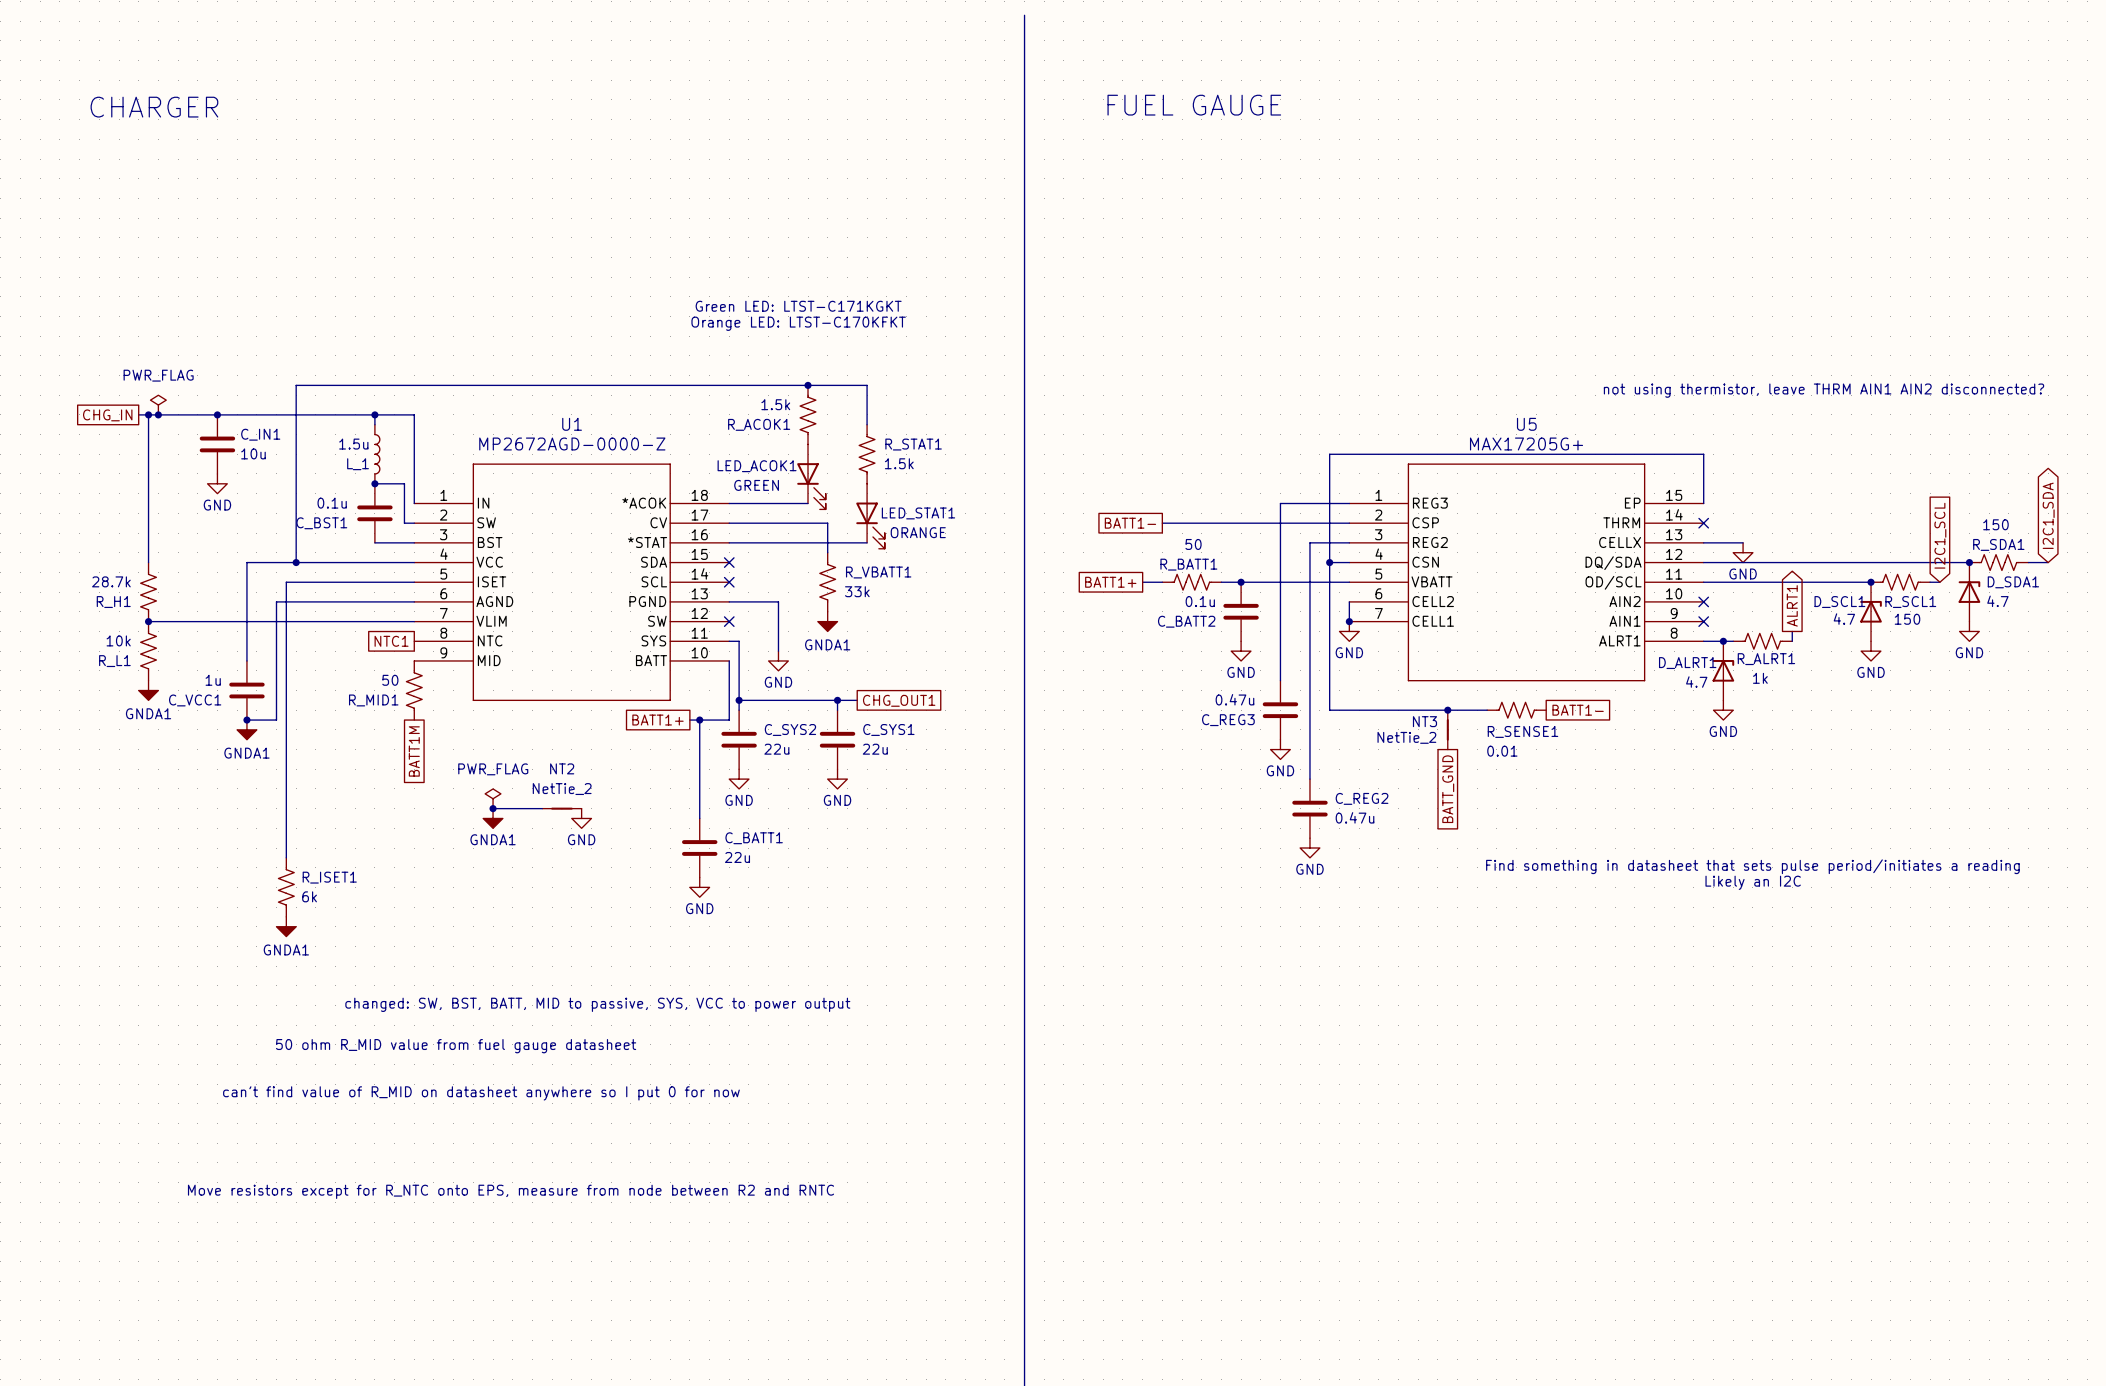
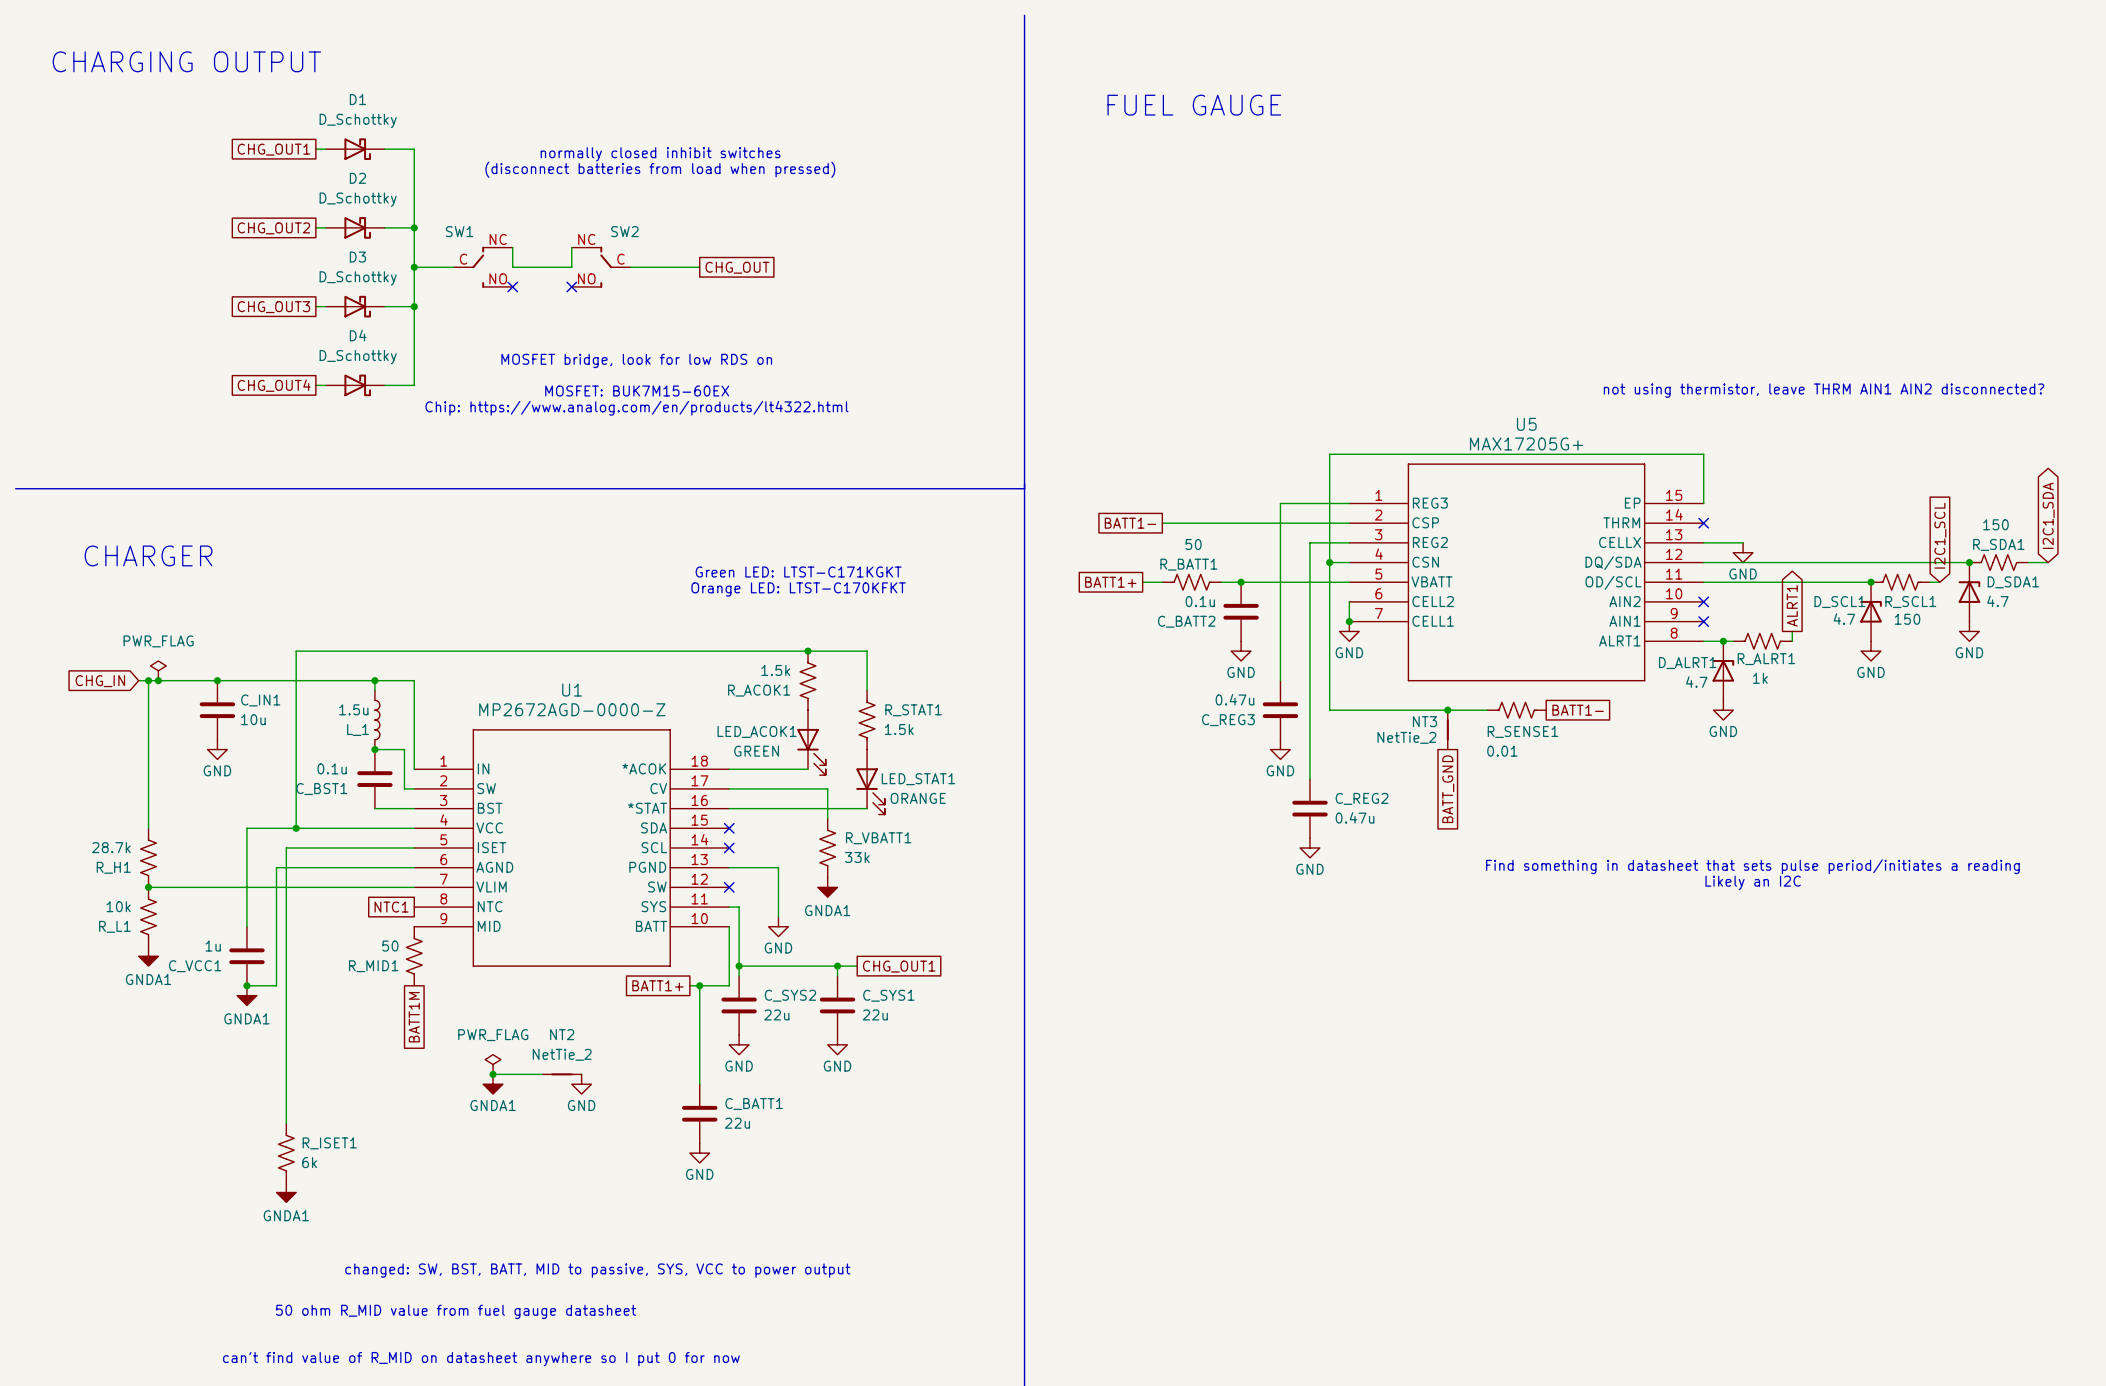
text: none -> CHARGING OUTPUT (186, 61)
text: CHARGER (154, 107) -> none
global label: none -> CHG_OUT1 (273, 149)
wire: none -> (315, 149) (325, 149)
D1: none -> D_Schottky (355, 149)
text: none -> normally closed inhibit switches (660, 154)
text: none -> (disconnect batteries from load when pressed) (660, 169)
wire: none -> (315, 227) (325, 227)
D2: none -> D_Schottky (355, 227)
wire: none -> (384, 227) (414, 227)
junction: none -> (414, 227)
global label: none -> CHG_OUT2 (273, 228)
wire: none -> (512, 247) (512, 267) (571, 267) (571, 247)
wire: none -> (414, 267) (453, 267)
junction: none -> (414, 267)
SW1: none -> (483, 267)
SW2: none -> (601, 267)
wire: none -> (630, 267) (699, 267)
global label: none -> CHG_OUT (737, 267)
no-connect mark: none -> (512, 286)
no-connect mark: none -> (571, 286)
wire: none -> (315, 306) (325, 306)
D3: none -> D_Schottky (355, 306)
wire: none -> (384, 306) (414, 306)
junction: none -> (414, 306)
text: Green LED: LTST-C171KGKT (798, 306) -> none
global label: none -> CHG_OUT3 (273, 307)
text: Orange LED: LTST-C170KFKT (798, 323) -> none
text: none -> MOSFET bridge, look for low RDS on (636, 360)
global label: none -> CHG_OUT4 (274, 385)
wire: (315, 385) (296, 385) (296, 562) -> none
D4: none -> D_Schottky (355, 385)
wire: (414, 385) (867, 385) (867, 424) -> (414, 385) (414, 149) (384, 149)
junction: (808, 385) -> none
text: none -> MOSFET: BUK7M15-60EX (637, 391)
power symbol: PWR_FLAG (158, 405) -> none
text: none -> Chip: https://www.analog.com/en/products/lt4322.html (636, 408)
wire: (138, 414) (414, 414) (414, 503) -> none
wire: (148, 414) (148, 562) -> none
junction: (148, 414) -> none
junction: (158, 414) -> none
junction: (217, 414) -> none
wire: (374, 414) (374, 424) -> none
junction: (374, 414) -> none
R_ACOK1 position: (808, 414) -> (808, 680)
global label: CHG_IN (107, 415) -> none
C_IN1 position: (217, 444) -> (217, 710)
L_1 position: (377, 454) -> (377, 720)
R_STAT1 position: (867, 454) -> (867, 720)
LED_ACOK1 position: (811, 476) -> (811, 742)
power symbol: GND (217, 483) -> none
wire: (374, 483) (404, 483) (404, 523) (414, 523) -> none
junction: (374, 483) -> none
line: none -> (15, 488) (1024, 488)
wire: (729, 503) (808, 503) -> none
C_BST1 position: (374, 513) -> (374, 779)
LED_STAT1 position: (870, 516) -> (870, 782)
wire: (729, 523) (827, 523) (827, 552) -> none
wire: (374, 542) (414, 542) -> none
wire: (729, 542) (867, 542) -> none
text: none -> CHARGER (148, 555)
junction: (296, 562) -> none
wire: (414, 562) (246, 562) (246, 660) -> none
no-connect mark: (729, 562) -> none
text: none -> Green LED: LTST-C171KGKT (798, 572)
wire: (414, 582) (286, 582) (286, 848) -> (414, 848) (286, 848)
U1 position: (571, 582) -> (571, 848)
no-connect mark: (729, 582) -> none
R_VBATT1 position: (827, 582) -> (827, 848)
text: none -> Orange LED: LTST-C170KFKT (798, 589)
R_H1 position: (148, 592) -> (148, 857)
wire: (414, 601) (276, 601) (276, 720) (246, 720) -> none
wire: (729, 601) (778, 601) (778, 651) -> none
wire: (148, 621) (414, 621) -> none
junction: (148, 621) -> none
no-connect mark: (729, 621) -> none
power symbol: GNDA1 (827, 621) -> none
global label: NTC1 (391, 641) -> none
wire: (729, 641) (739, 641) (739, 710) -> none
R_L1 position: (148, 651) -> (148, 916)
junction: none -> (808, 651)
wire: (729, 660) (729, 720) (689, 720) -> none
power symbol: GND (778, 660) -> none
power symbol: none -> PWR_FLAG (158, 670)
wire: none -> (138, 680) (414, 680) (414, 769)
wire: none -> (148, 680) (148, 828)
junction: none -> (148, 680)
junction: none -> (158, 680)
junction: none -> (217, 680)
wire: none -> (374, 680) (374, 690)
junction: none -> (374, 680)
global label: none -> CHG_IN (100, 681)
power symbol: GNDA1 (148, 690) -> none
C_VCC1 position: (246, 690) -> (246, 956)
R_MID1 position: (414, 690) -> (414, 956)
wire: none -> (867, 690) (867, 651) (296, 651) (296, 828)
wire: (739, 700) (857, 700) -> none
junction: (739, 700) -> none
wire: (837, 700) (837, 710) -> none
junction: (837, 700) -> none
global label: CHG_OUT1 (899, 700) -> none
junction: (246, 720) -> none
global label: BATT1+ (658, 720) -> none
wire: (699, 720) (699, 818) -> none
junction: (699, 720) -> none
power symbol: GNDA1 (246, 729) -> none
C_SYS2 position: (739, 739) -> (739, 1005)
C_SYS1 position: (837, 739) -> (837, 1005)
power symbol: none -> GND (217, 749)
wire: none -> (374, 749) (404, 749) (404, 788) (414, 788)
junction: none -> (374, 749)
global label: BATT1M (414, 751) -> none
wire: none -> (729, 769) (808, 769)
power symbol: GND (739, 779) -> none
power symbol: GND (837, 779) -> none
wire: none -> (729, 788) (827, 788) (827, 818)
power symbol: PWR_FLAG (493, 798) -> none
wire: none -> (374, 808) (414, 808)
wire: (493, 808) (542, 808) -> none
junction: (493, 808) -> none
NT2 position: (561, 808) -> (561, 1074)
wire: none -> (729, 808) (867, 808)
power symbol: GNDA1 (493, 818) -> none
power symbol: GND (581, 818) -> none
junction: none -> (296, 828)
wire: none -> (414, 828) (246, 828) (246, 926)
no-connect mark: none -> (729, 828)
C_BATT1 position: (699, 848) -> (699, 1113)
no-connect mark: none -> (729, 848)
wire: none -> (286, 857) (286, 1123)
wire: none -> (414, 867) (276, 867) (276, 985) (246, 985)
wire: none -> (729, 867) (778, 867) (778, 916)
wire: none -> (148, 887) (414, 887)
junction: none -> (148, 887)
R_ISET1 position: (286, 887) -> (286, 1153)
power symbol: GND (699, 887) -> none
no-connect mark: none -> (729, 887)
power symbol: none -> GNDA1 (827, 887)
global label: none -> NTC1 (391, 907)
wire: none -> (729, 907) (739, 907) (739, 975)
power symbol: GNDA1 (286, 926) -> none
wire: none -> (729, 926) (729, 985) (689, 985)
power symbol: none -> GND (778, 926)
power symbol: none -> GNDA1 (148, 956)
wire: none -> (739, 966) (857, 966)
junction: none -> (739, 966)
wire: none -> (837, 966) (837, 975)
junction: none -> (837, 966)
global label: none -> CHG_OUT1 (899, 966)
junction: none -> (246, 985)
global label: none -> BATT1+ (658, 985)
wire: none -> (699, 985) (699, 1084)
junction: none -> (699, 985)
power symbol: none -> GNDA1 (246, 995)
text: changed: SW, BST, BATT, MID to passive, SYS, VCC to power output (597, 1004) -> none
global label: none -> BATT1M (414, 1017)
power symbol: none -> GND (739, 1044)
power symbol: none -> GND (837, 1044)
text: 50 ohm R_MID value from fuel gauge datasheet (456, 1046) -> none
power symbol: none -> PWR_FLAG (493, 1064)
wire: none -> (493, 1074) (542, 1074)
junction: none -> (493, 1074)
power symbol: none -> GNDA1 (493, 1084)
power symbol: none -> GND (581, 1084)
text: can't find value of R_MID on datasheet anywhere so I put 0 for now (481, 1093) -> none
power symbol: none -> GND (699, 1153)
text: Move resistors except for R_NTC onto EPS, measure from node between R2 and RNTC (510, 1191) -> none
power symbol: none -> GNDA1 (286, 1192)
text: none -> changed: SW, BST, BATT, MID to passive, SYS, VCC to power output (597, 1270)
text: none -> 50 ohm R_MID value from fuel gauge datasheet (456, 1311)
text: none -> can't find value of R_MID on datasheet anywhere so I put 0 for now (481, 1359)

